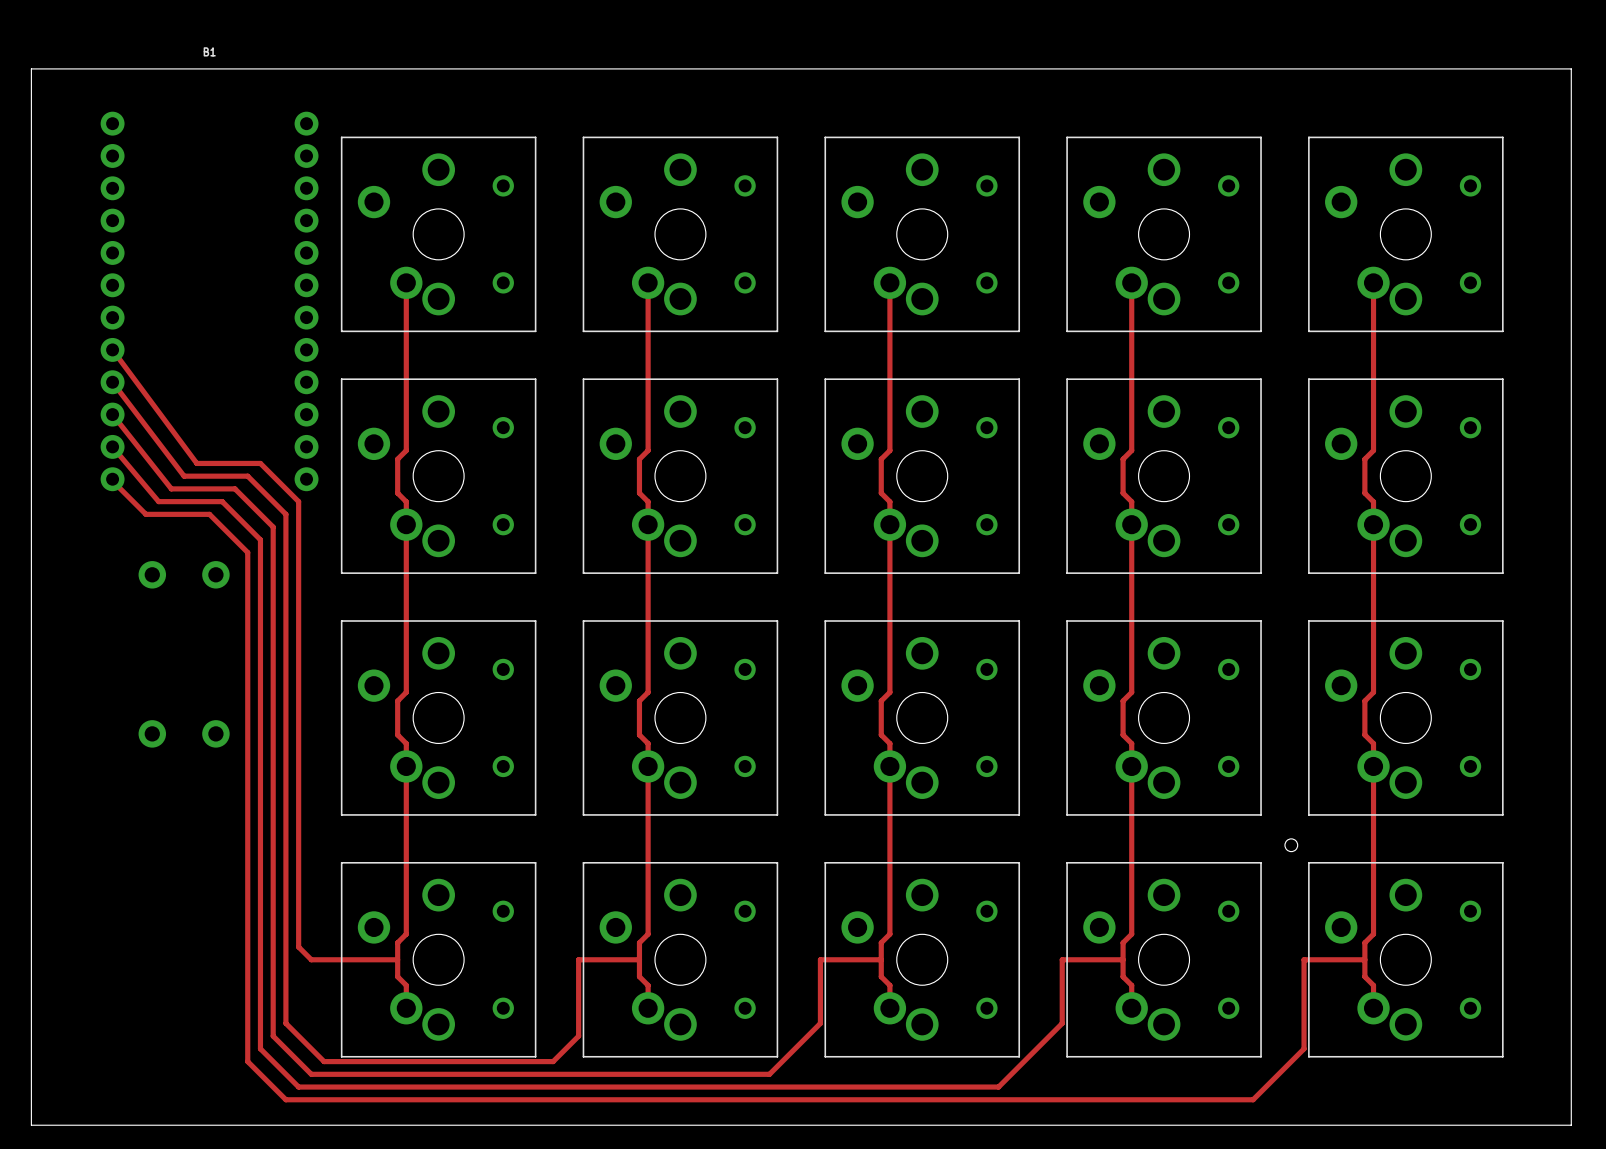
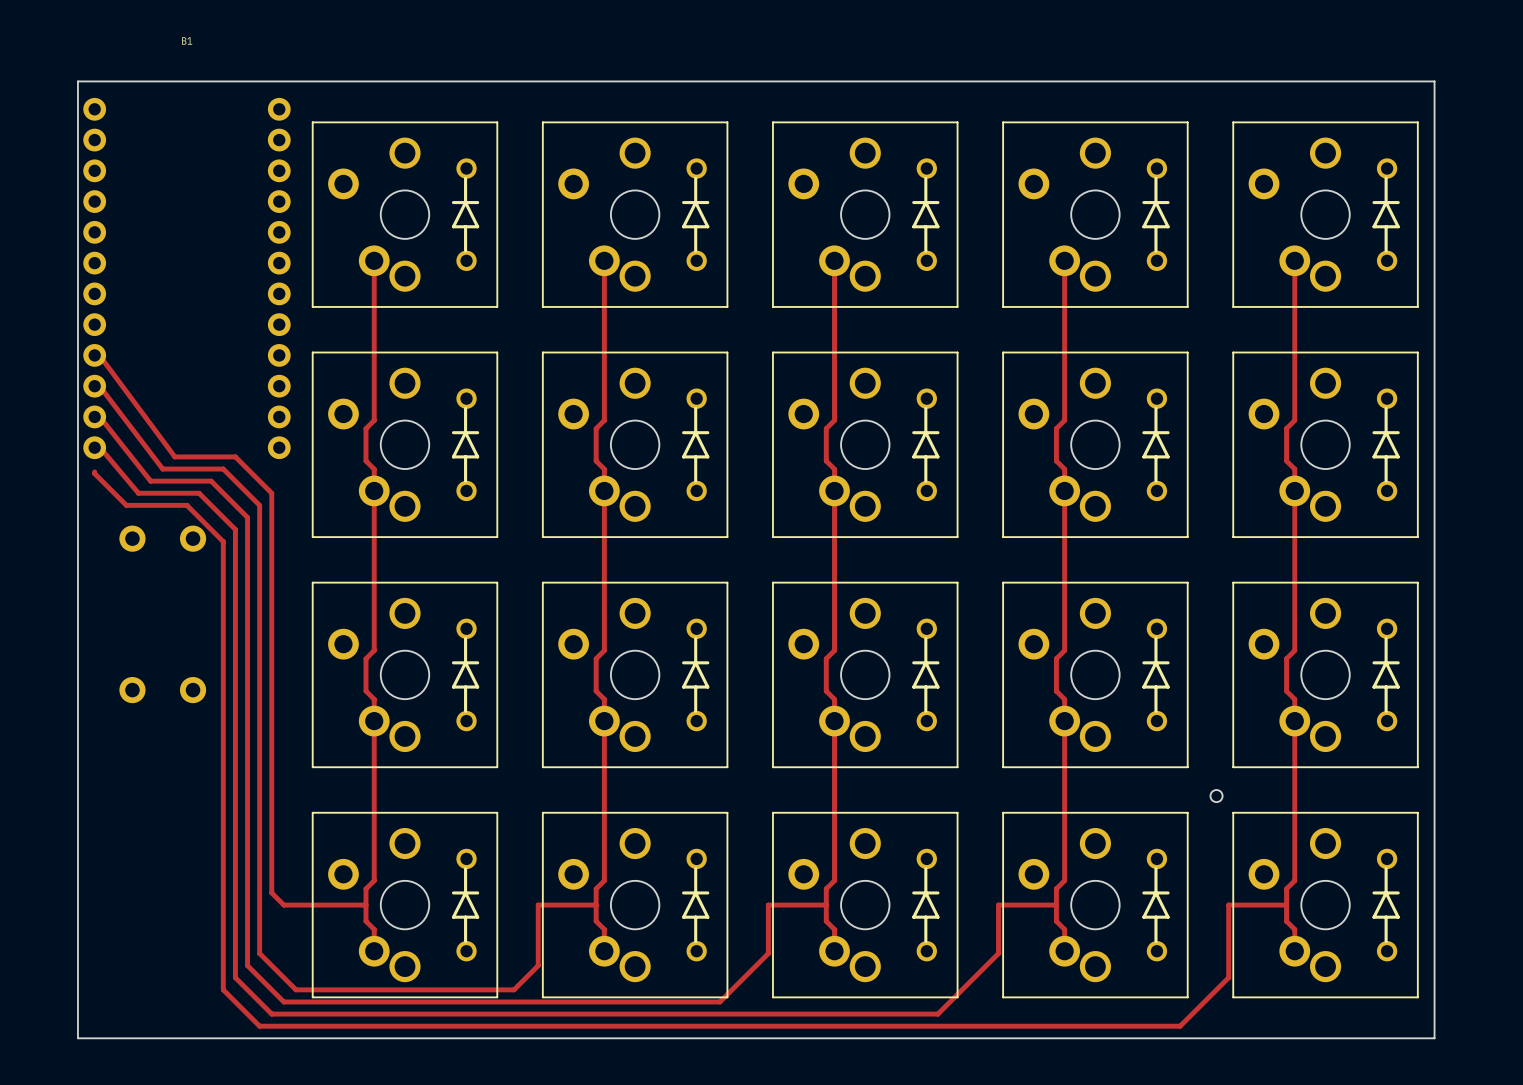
board edge: (31, 68) (1571, 68) (1571, 1125) (31, 1125) (31, 68) -> (77, 81) (77, 1038) (1434, 1038) (1434, 81) (77, 81)
line: none -> (465, 178) (465, 202)
line: none -> (695, 178) (695, 202)
line: none -> (925, 178) (925, 202)
line: none -> (1155, 178) (1155, 202)
line: none -> (1386, 178) (1386, 202)
line: none -> (453, 202) (477, 202)
line: none -> (465, 202) (453, 226) (477, 226) (465, 202)
line: none -> (683, 202) (707, 202)
line: none -> (695, 202) (683, 226) (707, 226) (695, 202)
line: none -> (913, 202) (937, 202)
line: none -> (925, 202) (913, 226) (937, 226) (925, 202)
line: none -> (1143, 202) (1168, 202)
line: none -> (1155, 202) (1143, 226) (1168, 226) (1155, 202)
line: none -> (1373, 202) (1398, 202)
line: none -> (1386, 202) (1373, 226) (1398, 226) (1386, 202)
line: none -> (465, 226) (465, 251)
line: none -> (695, 226) (695, 251)
line: none -> (925, 226) (925, 251)
line: none -> (1155, 226) (1155, 251)
line: none -> (1386, 226) (1386, 251)
track: (112, 349) (196, 463) (260, 463) (298, 501) (298, 527) -> none
track: (112, 382) (184, 476) (247, 476) (260, 488) -> none
track: (112, 414) (171, 488) (196, 488) -> (94, 348) (174, 456)
line: none -> (465, 408) (465, 432)
line: none -> (695, 408) (695, 432)
line: none -> (925, 408) (925, 432)
line: none -> (1155, 408) (1155, 432)
line: none -> (1386, 408) (1386, 432)
track: (112, 446) (158, 501) (184, 501) -> (94, 379) (162, 469)
line: none -> (453, 432) (477, 432)
line: none -> (465, 432) (453, 456) (477, 456) (465, 432)
line: none -> (683, 432) (707, 432)
line: none -> (695, 432) (683, 456) (707, 456) (695, 432)
line: none -> (913, 432) (937, 432)
line: none -> (925, 432) (913, 456) (937, 456) (925, 432)
line: none -> (1143, 432) (1168, 432)
line: none -> (1155, 432) (1143, 456) (1168, 456) (1155, 432)
line: none -> (1373, 432) (1398, 432)
line: none -> (1386, 432) (1373, 456) (1398, 456) (1386, 432)
track: none -> (94, 441) (138, 493) (199, 493)
track: (112, 479) (145, 514) (171, 514) -> (94, 410) (150, 481)
track: (235, 488) (247, 501) -> (211, 456) (235, 456)
line: none -> (465, 456) (465, 481)
line: none -> (695, 456) (695, 481)
line: none -> (925, 456) (925, 481)
line: none -> (1155, 456) (1155, 481)
line: none -> (1386, 456) (1386, 481)
track: (222, 501) (235, 514) -> (199, 469) (223, 469)
track: none -> (94, 471) (126, 505) (186, 505) (223, 541)
track: (209, 514) (222, 527) -> (186, 481) (211, 481)
track: (285, 514) (285, 539) -> (259, 481) (271, 493)
track: (273, 527) (273, 552) -> (247, 493) (259, 505)
track: (260, 539) (260, 565) -> (235, 505) (247, 517)
track: (247, 552) (247, 577) -> (223, 517) (235, 529)
line: none -> (465, 638) (465, 662)
line: none -> (695, 638) (695, 662)
line: none -> (925, 638) (925, 662)
line: none -> (1155, 638) (1155, 662)
line: none -> (1386, 638) (1386, 662)
line: none -> (453, 662) (477, 662)
line: none -> (465, 662) (453, 687) (477, 687) (465, 662)
line: none -> (683, 662) (707, 662)
line: none -> (695, 662) (707, 687) (683, 687) (695, 662)
line: none -> (913, 662) (937, 662)
line: none -> (925, 662) (937, 687) (913, 687) (925, 662)
line: none -> (1143, 662) (1168, 662)
line: none -> (1155, 662) (1168, 687) (1143, 687) (1155, 662)
line: none -> (1373, 662) (1398, 662)
line: none -> (1386, 662) (1398, 687) (1373, 687) (1386, 662)
line: none -> (465, 687) (465, 711)
line: none -> (695, 687) (695, 711)
line: none -> (925, 687) (925, 711)
line: none -> (1155, 687) (1155, 711)
line: none -> (1386, 687) (1386, 711)
line: none -> (465, 868) (465, 892)
line: none -> (695, 868) (695, 892)
line: none -> (925, 868) (925, 892)
line: none -> (1155, 868) (1155, 892)
line: none -> (1386, 868) (1386, 892)
line: none -> (453, 892) (477, 892)
line: none -> (465, 892) (453, 917) (477, 917) (465, 892)
line: none -> (683, 892) (707, 892)
line: none -> (695, 892) (707, 917) (683, 917) (695, 892)
line: none -> (913, 892) (937, 892)
line: none -> (925, 892) (937, 917) (913, 917) (925, 892)
line: none -> (1143, 892) (1168, 892)
line: none -> (1155, 892) (1168, 917) (1143, 917) (1155, 892)
line: none -> (1373, 892) (1398, 892)
line: none -> (1386, 892) (1398, 917) (1373, 917) (1386, 892)
line: none -> (465, 917) (465, 941)
line: none -> (695, 917) (695, 941)
line: none -> (925, 917) (925, 941)
line: none -> (1155, 917) (1155, 941)
line: none -> (1386, 917) (1386, 941)
track: (285, 1010) (285, 1023) (324, 1061) -> (247, 965) (283, 1001) (295, 1001)
track: (820, 1010) (820, 1023) (769, 1074) -> (768, 953) (719, 1001) (514, 1001)
track: (1062, 1010) (1062, 1023) (998, 1087) -> (998, 953) (937, 1014) (719, 1014)
track: (273, 1023) (273, 1036) (311, 1074) -> (235, 977) (271, 1014) (283, 1014)
track: (578, 1023) (578, 1036) (553, 1061) -> (538, 965) (514, 989) (295, 989) (259, 953)
track: (260, 1036) (260, 1048) (298, 1087) -> (223, 989) (259, 1026) (271, 1026)
track: (1304, 1036) (1304, 1048) (1253, 1099) (285, 1099) (247, 1061) (247, 1048) -> (1228, 977) (1180, 1026) (937, 1026)

